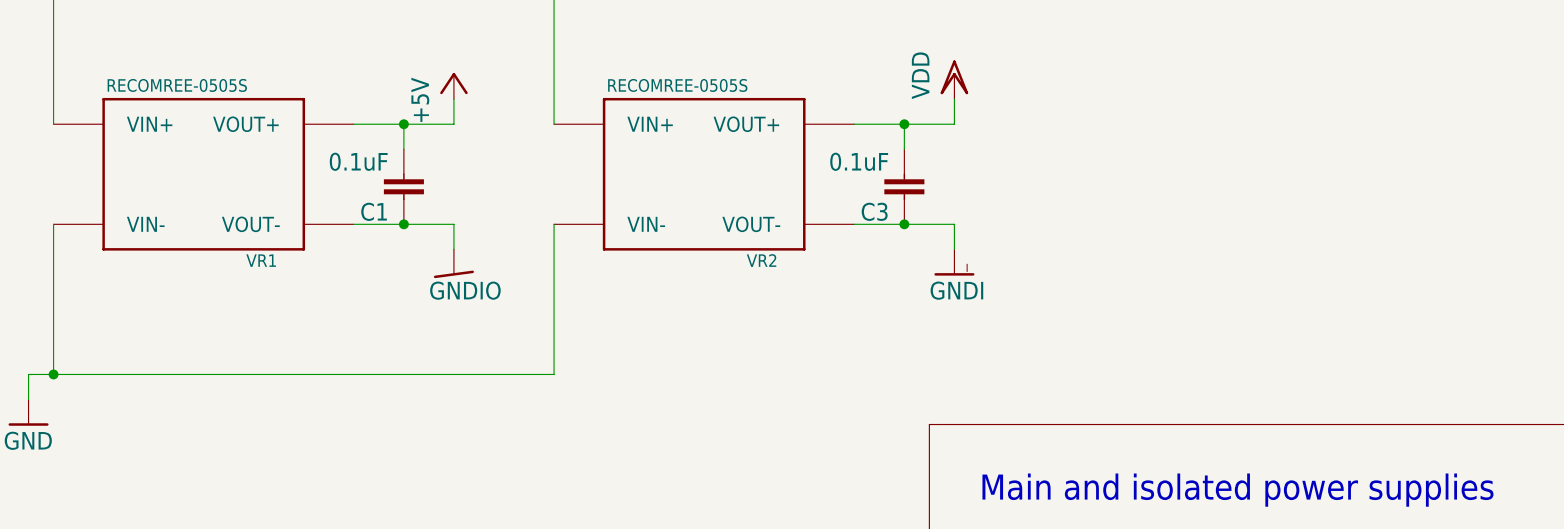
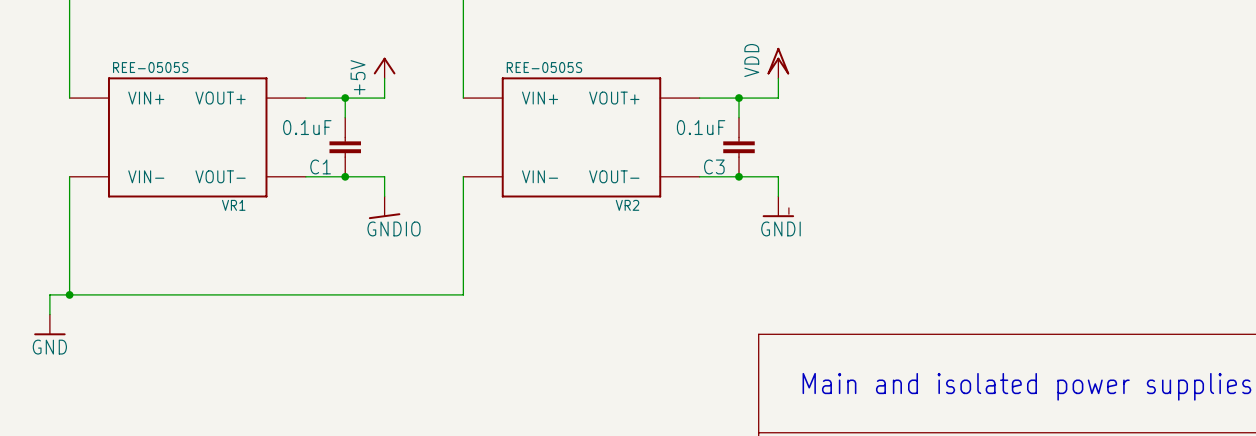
VR1 value: RECOMREE-0505S (177, 85) -> REE-0505S (150, 67)
VR2 value: RECOMREE-0505S (677, 85) -> REE-0505S (544, 67)

